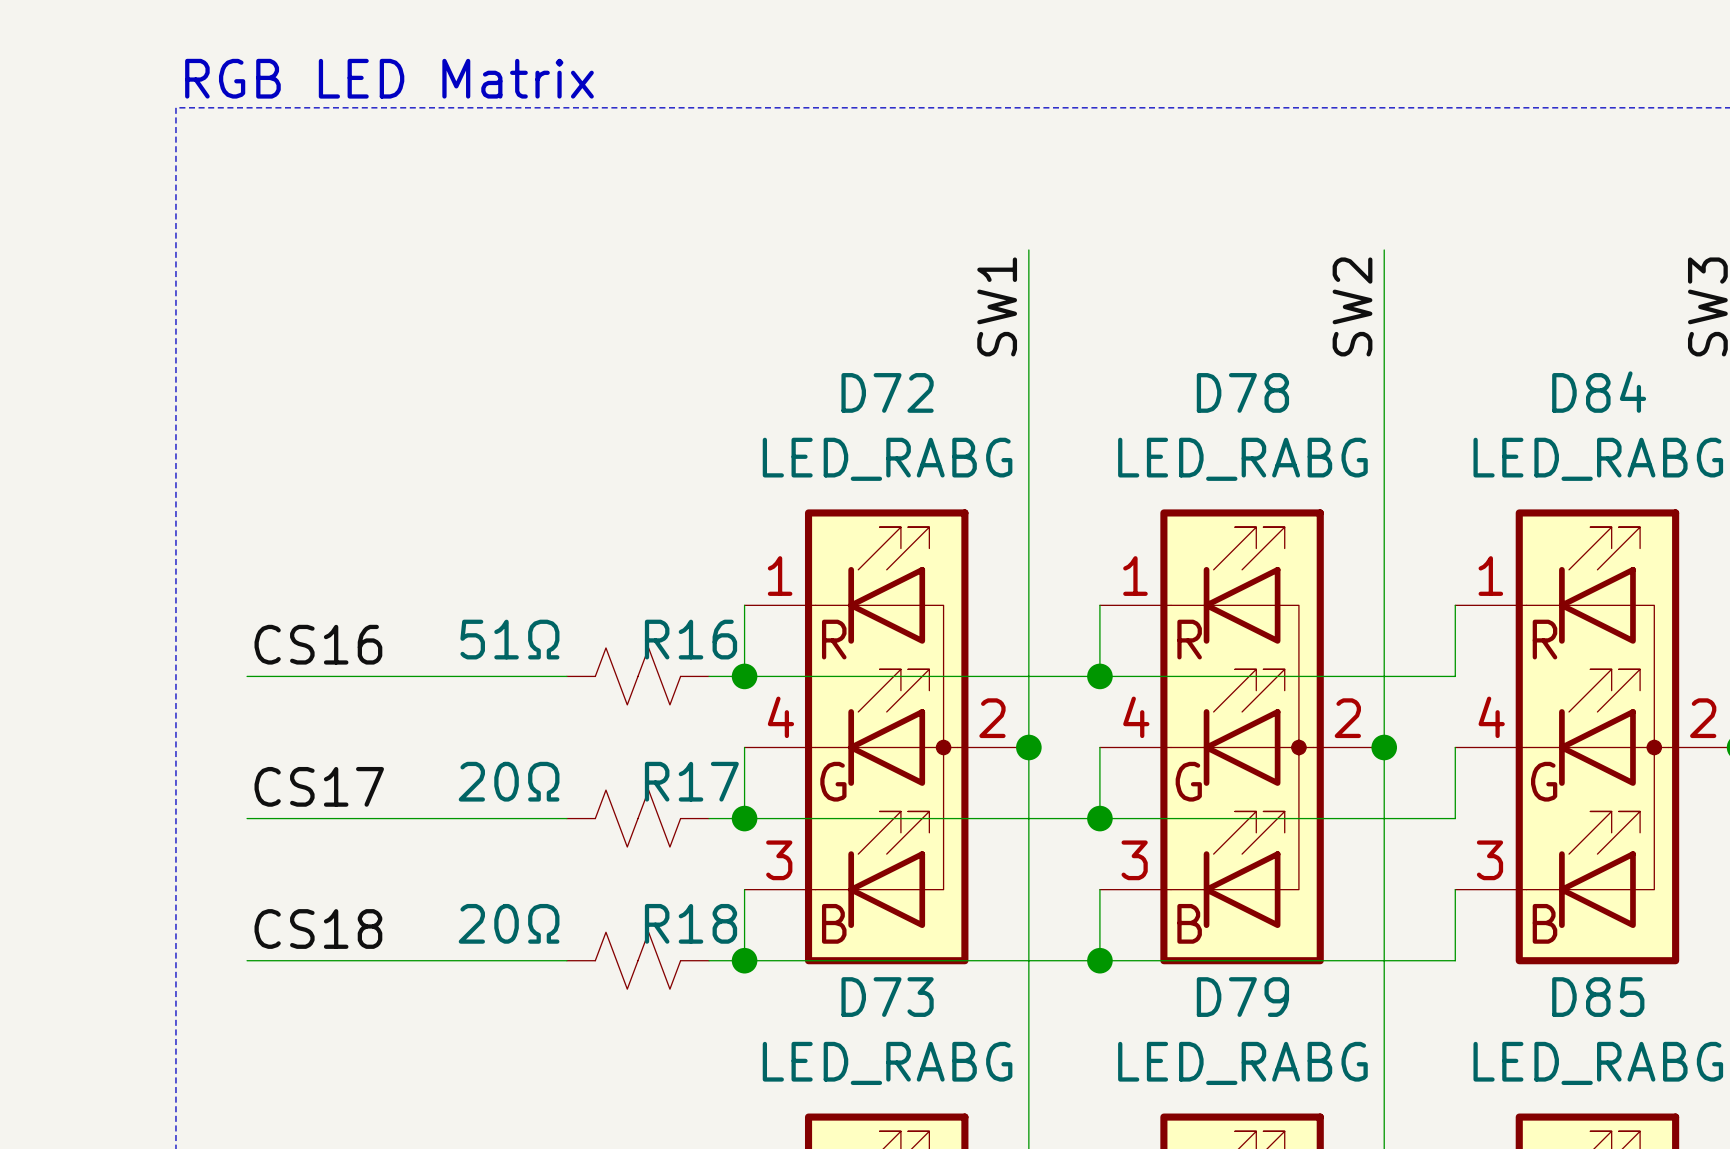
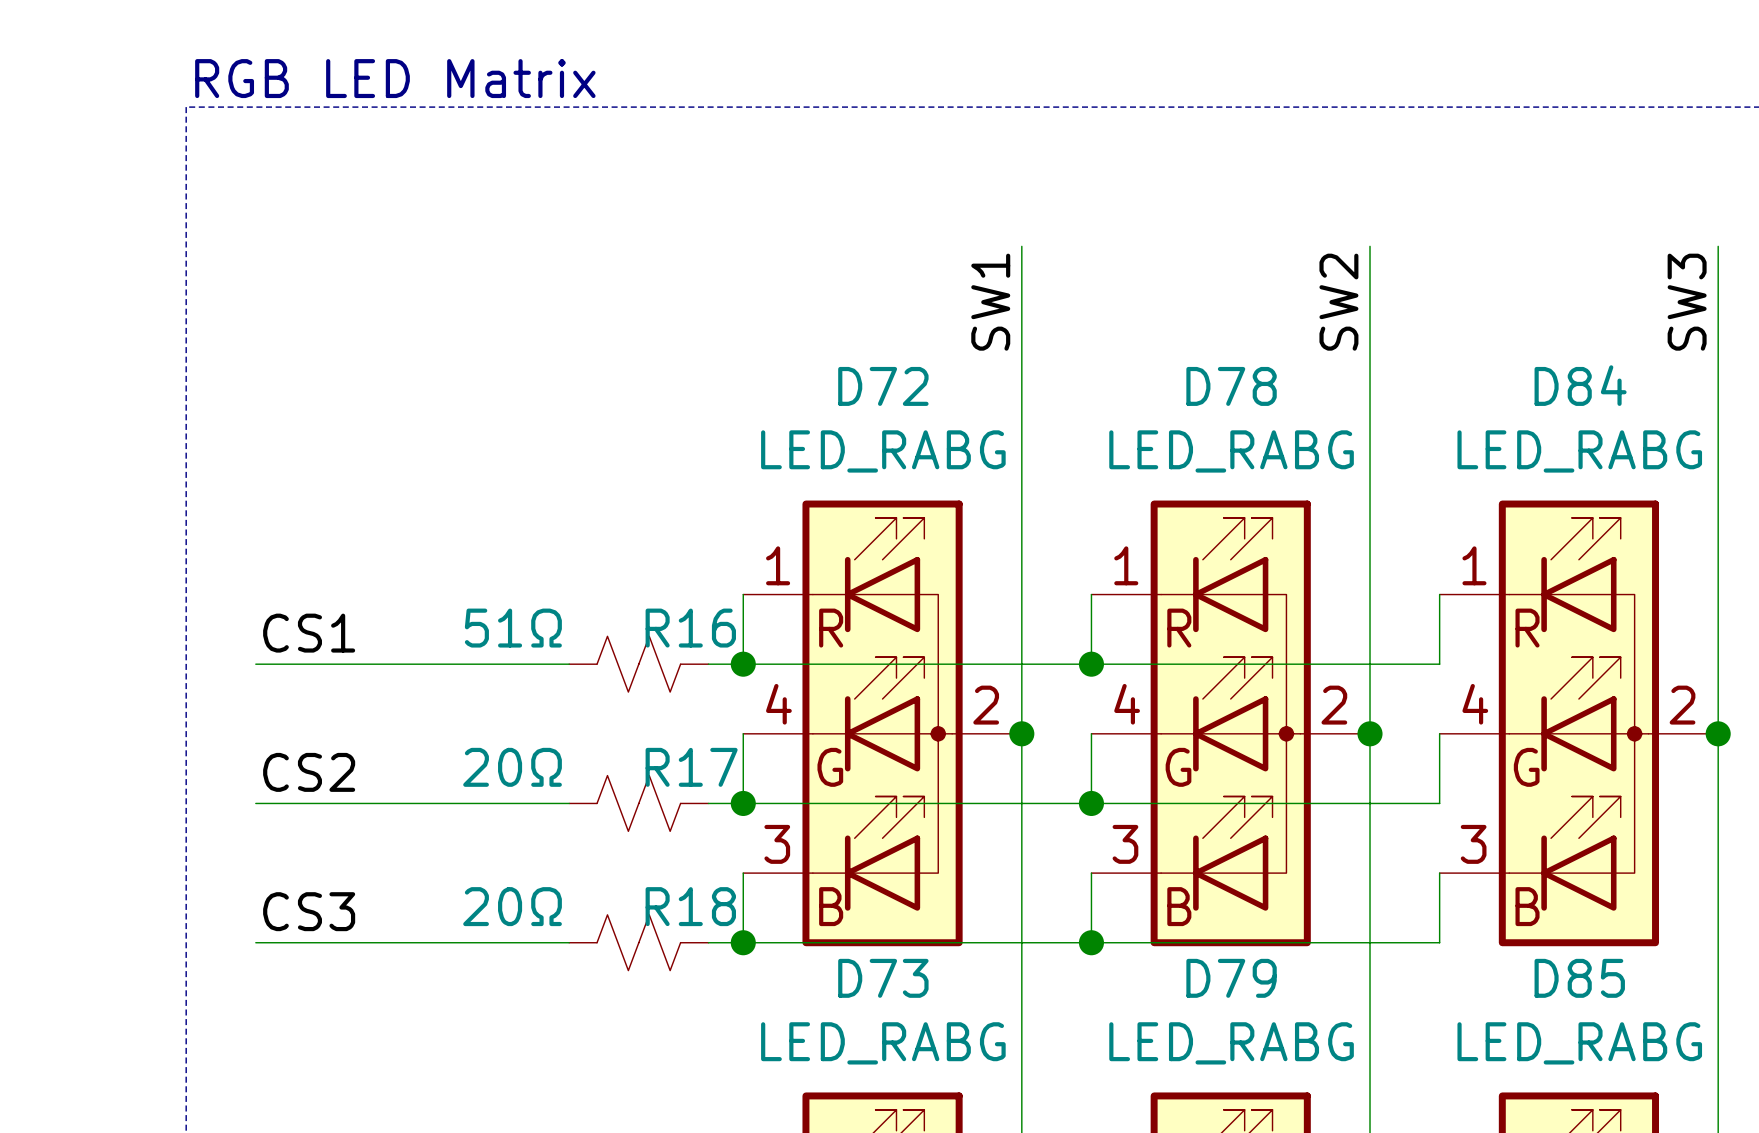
label: CS16 (318, 644) -> CS1 (309, 633)
label: CS17 (319, 786) -> CS2 (309, 772)
label: CS18 (318, 929) -> CS3 (309, 911)

